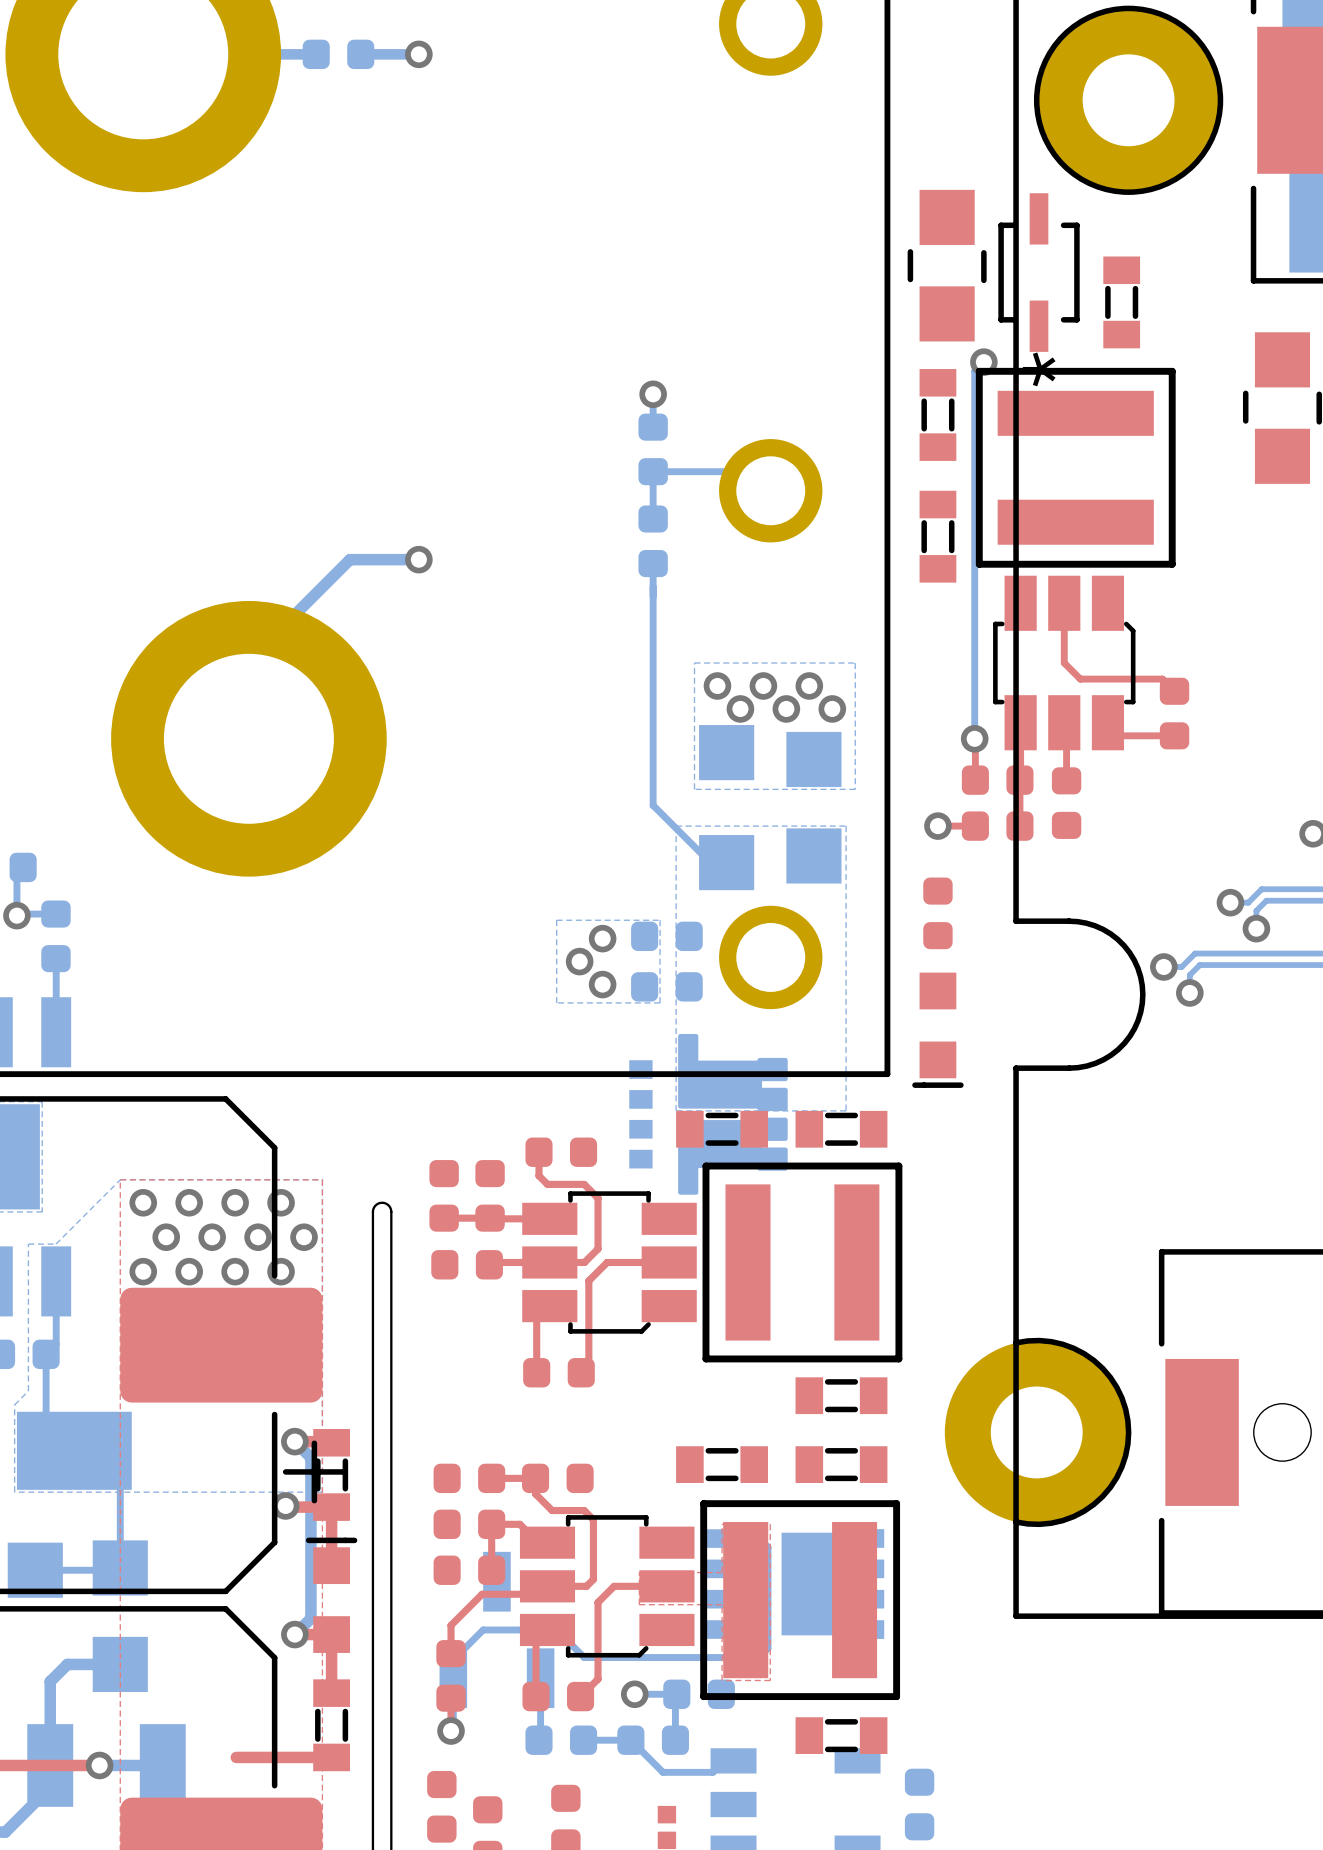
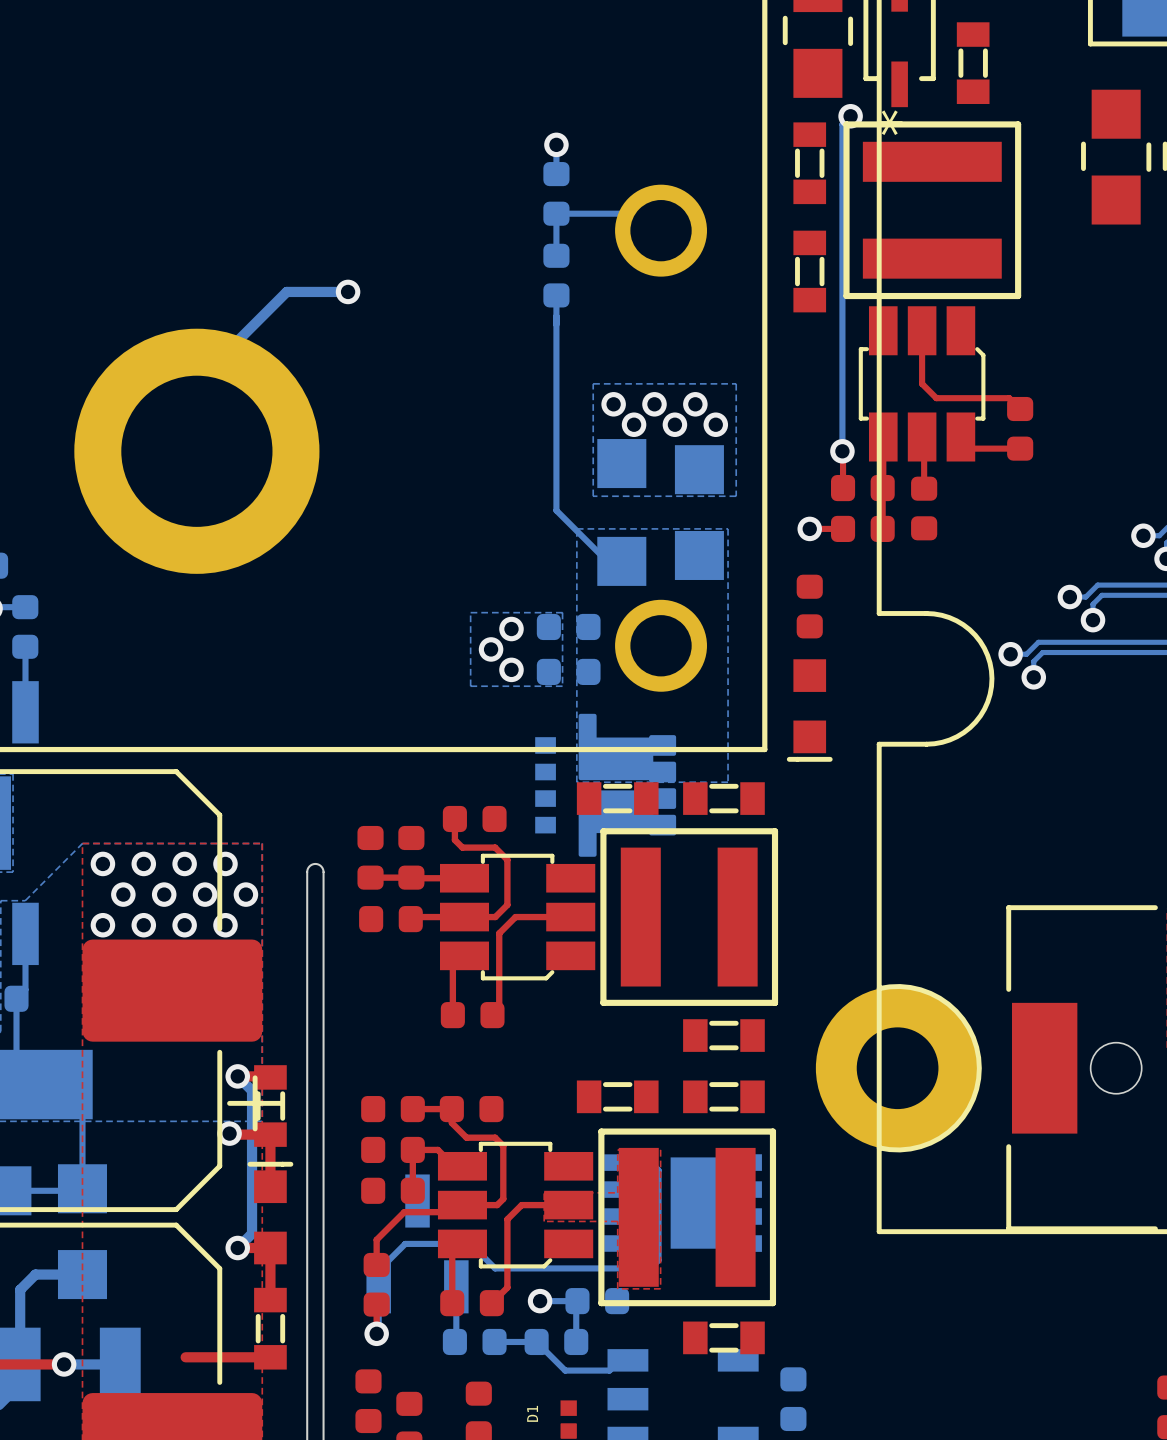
D1 name: none -> D1 (532, 1413)

